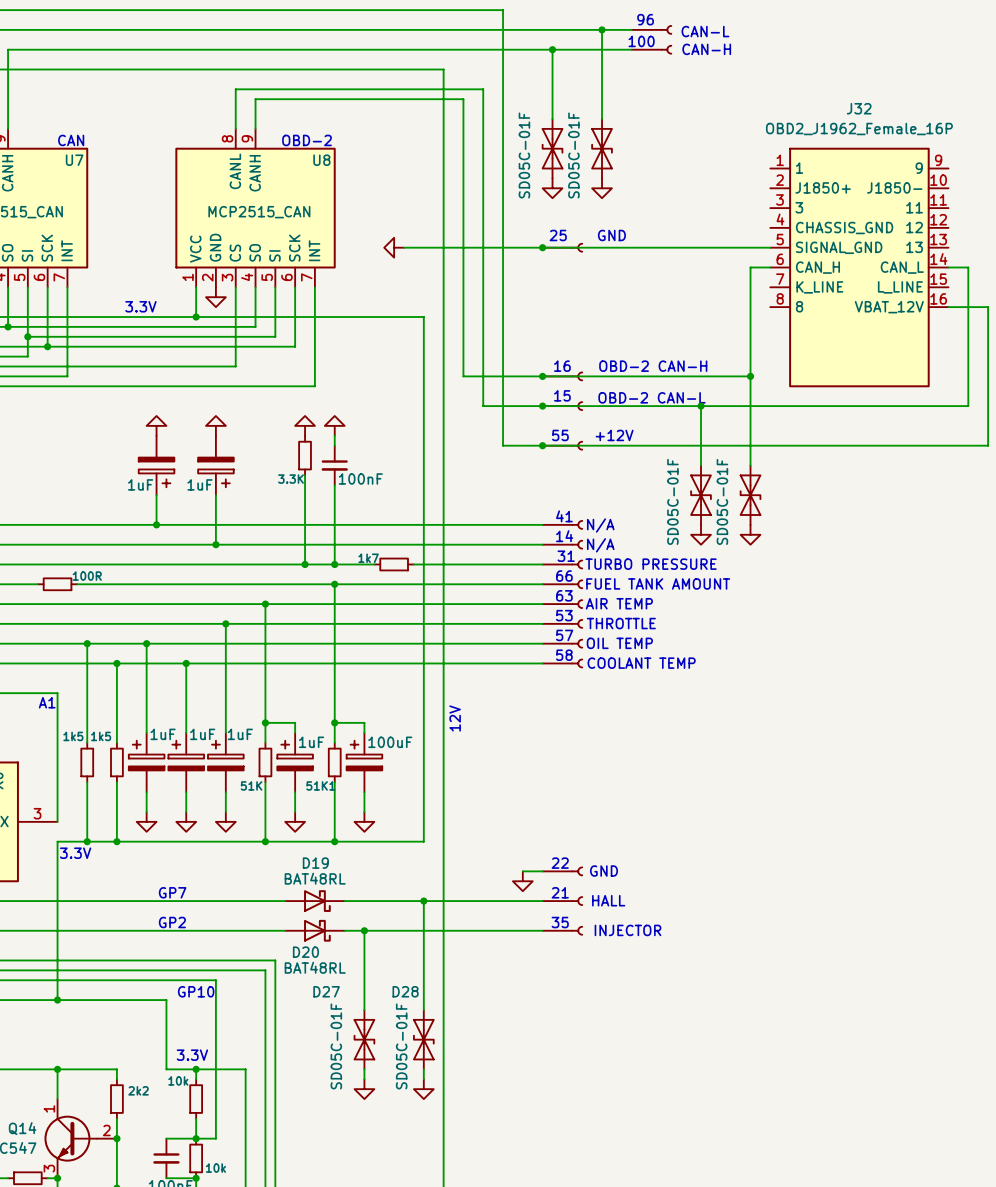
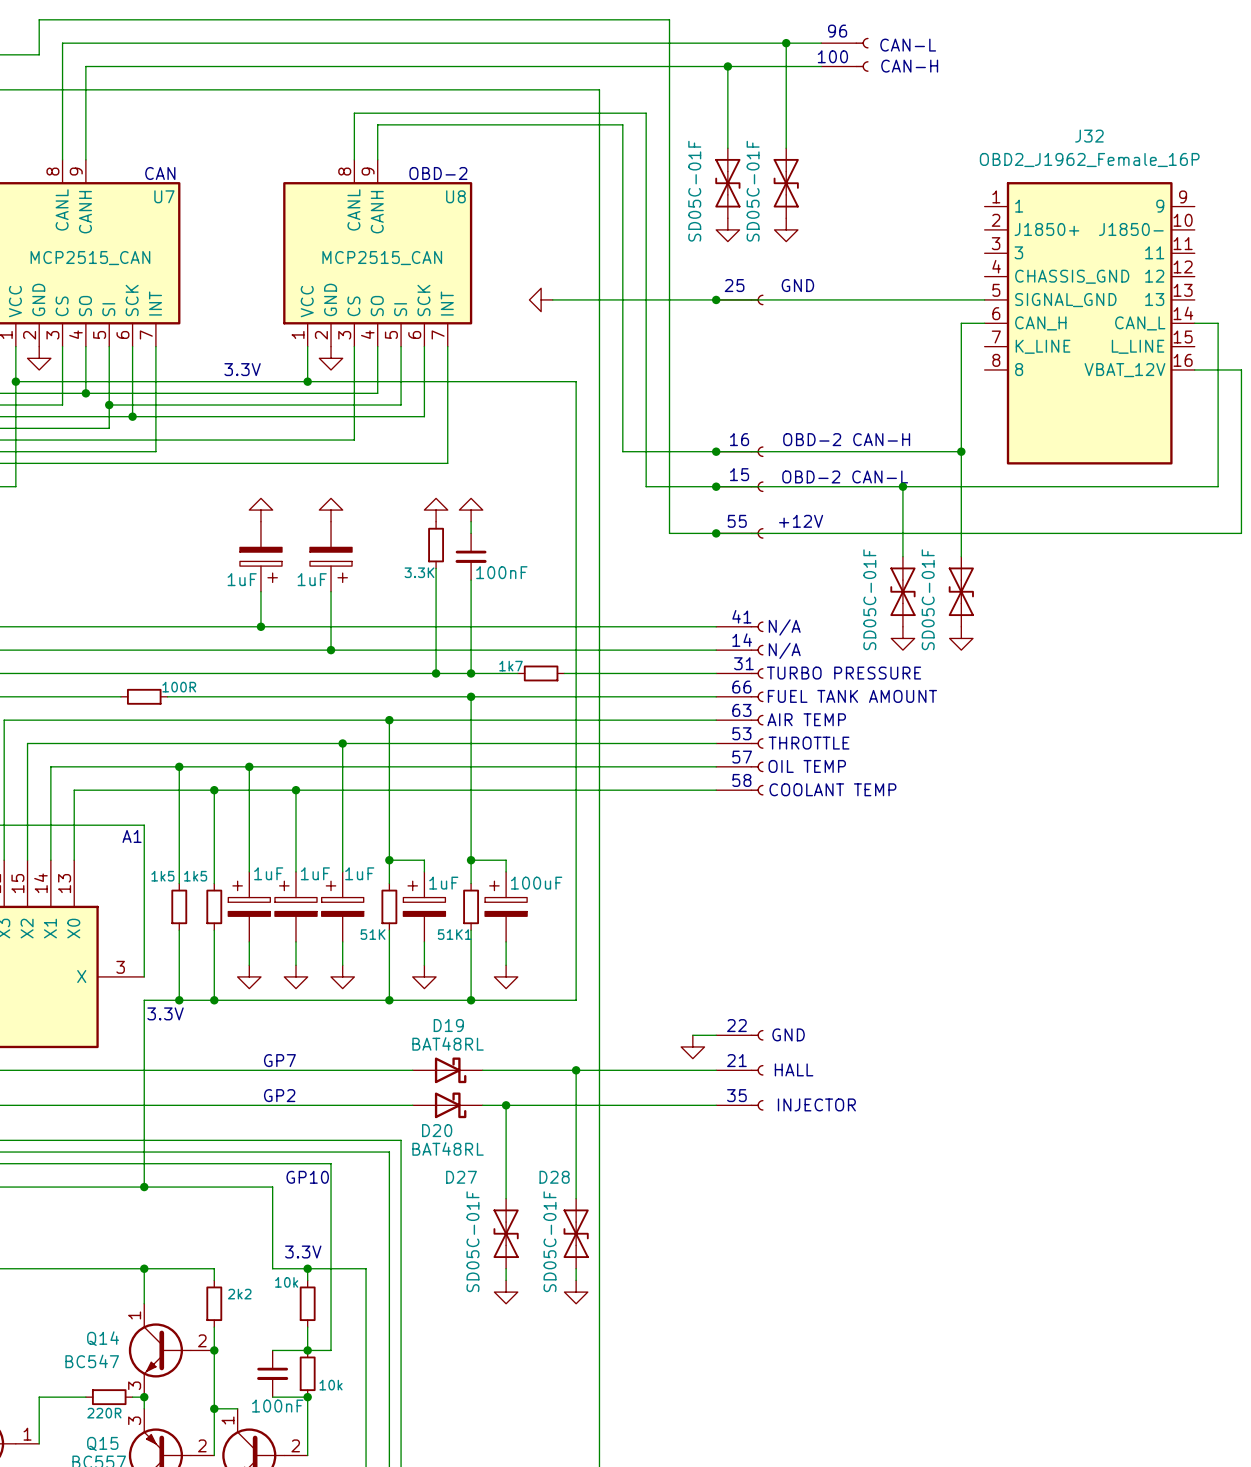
text: 12V (455, 718) -> none

